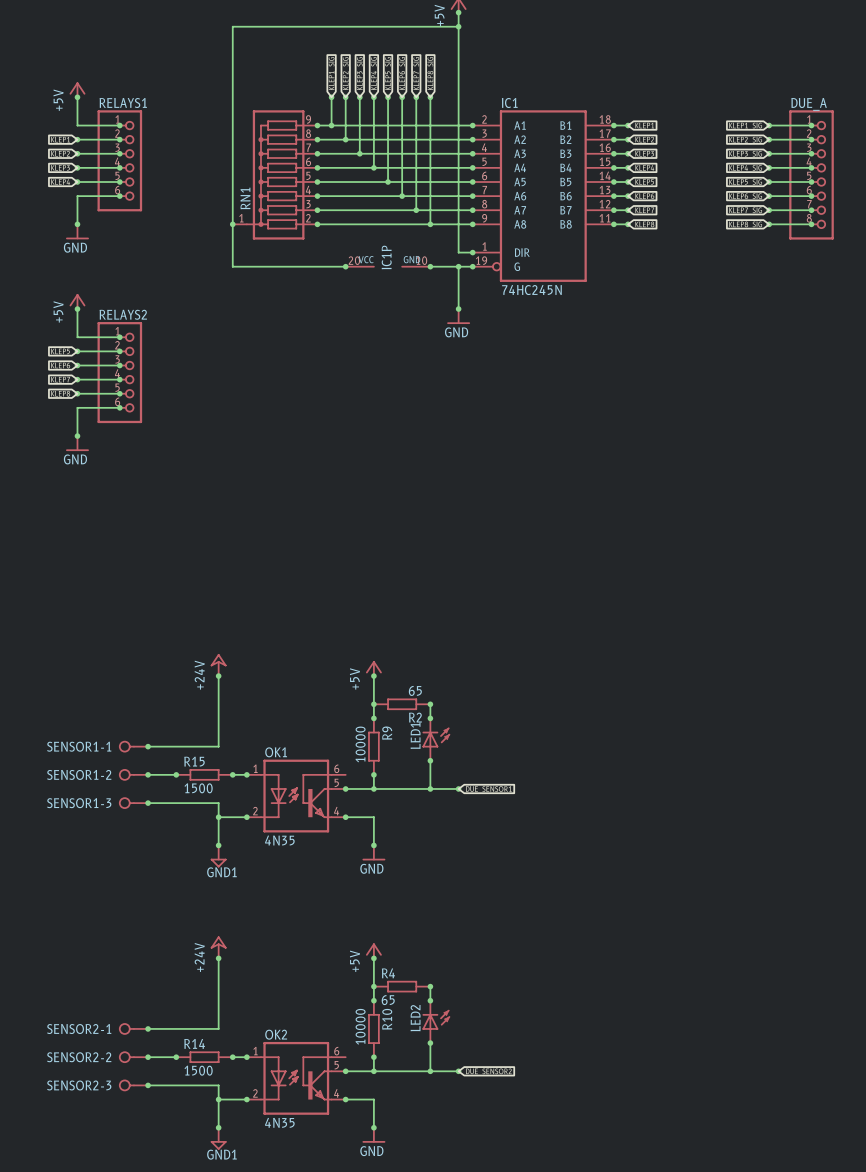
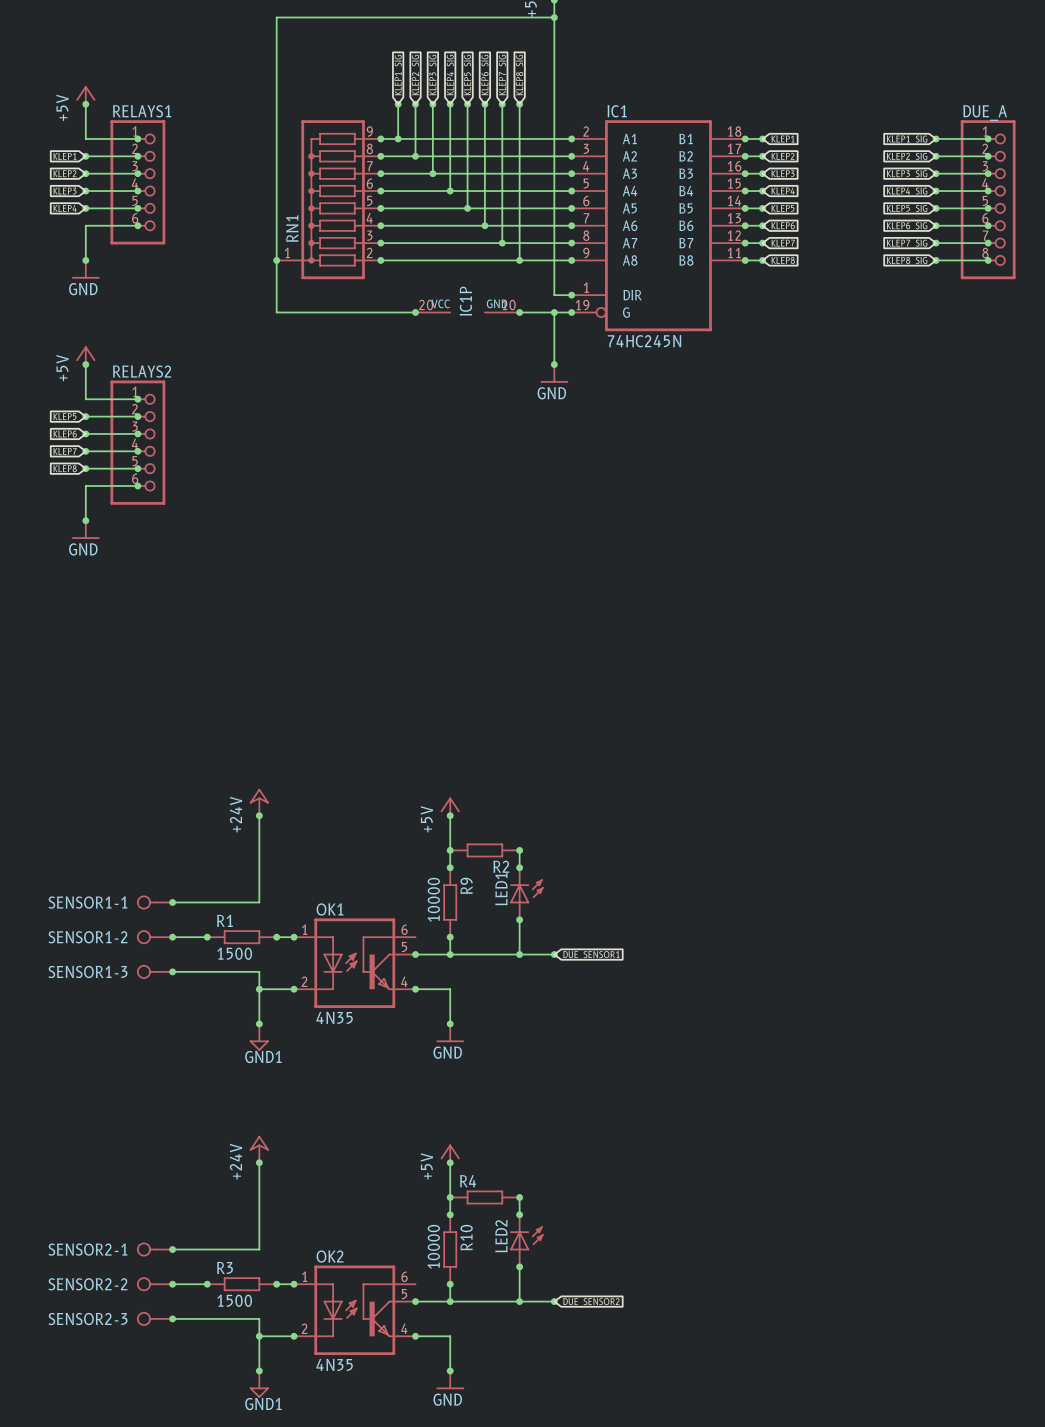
R2 value: 65 (415, 690) -> none
R15 name: R15 (194, 761) -> R1 (224, 920)
R4 value: 65 (388, 1000) -> none
R14 name: R14 (194, 1043) -> R3 (225, 1267)

